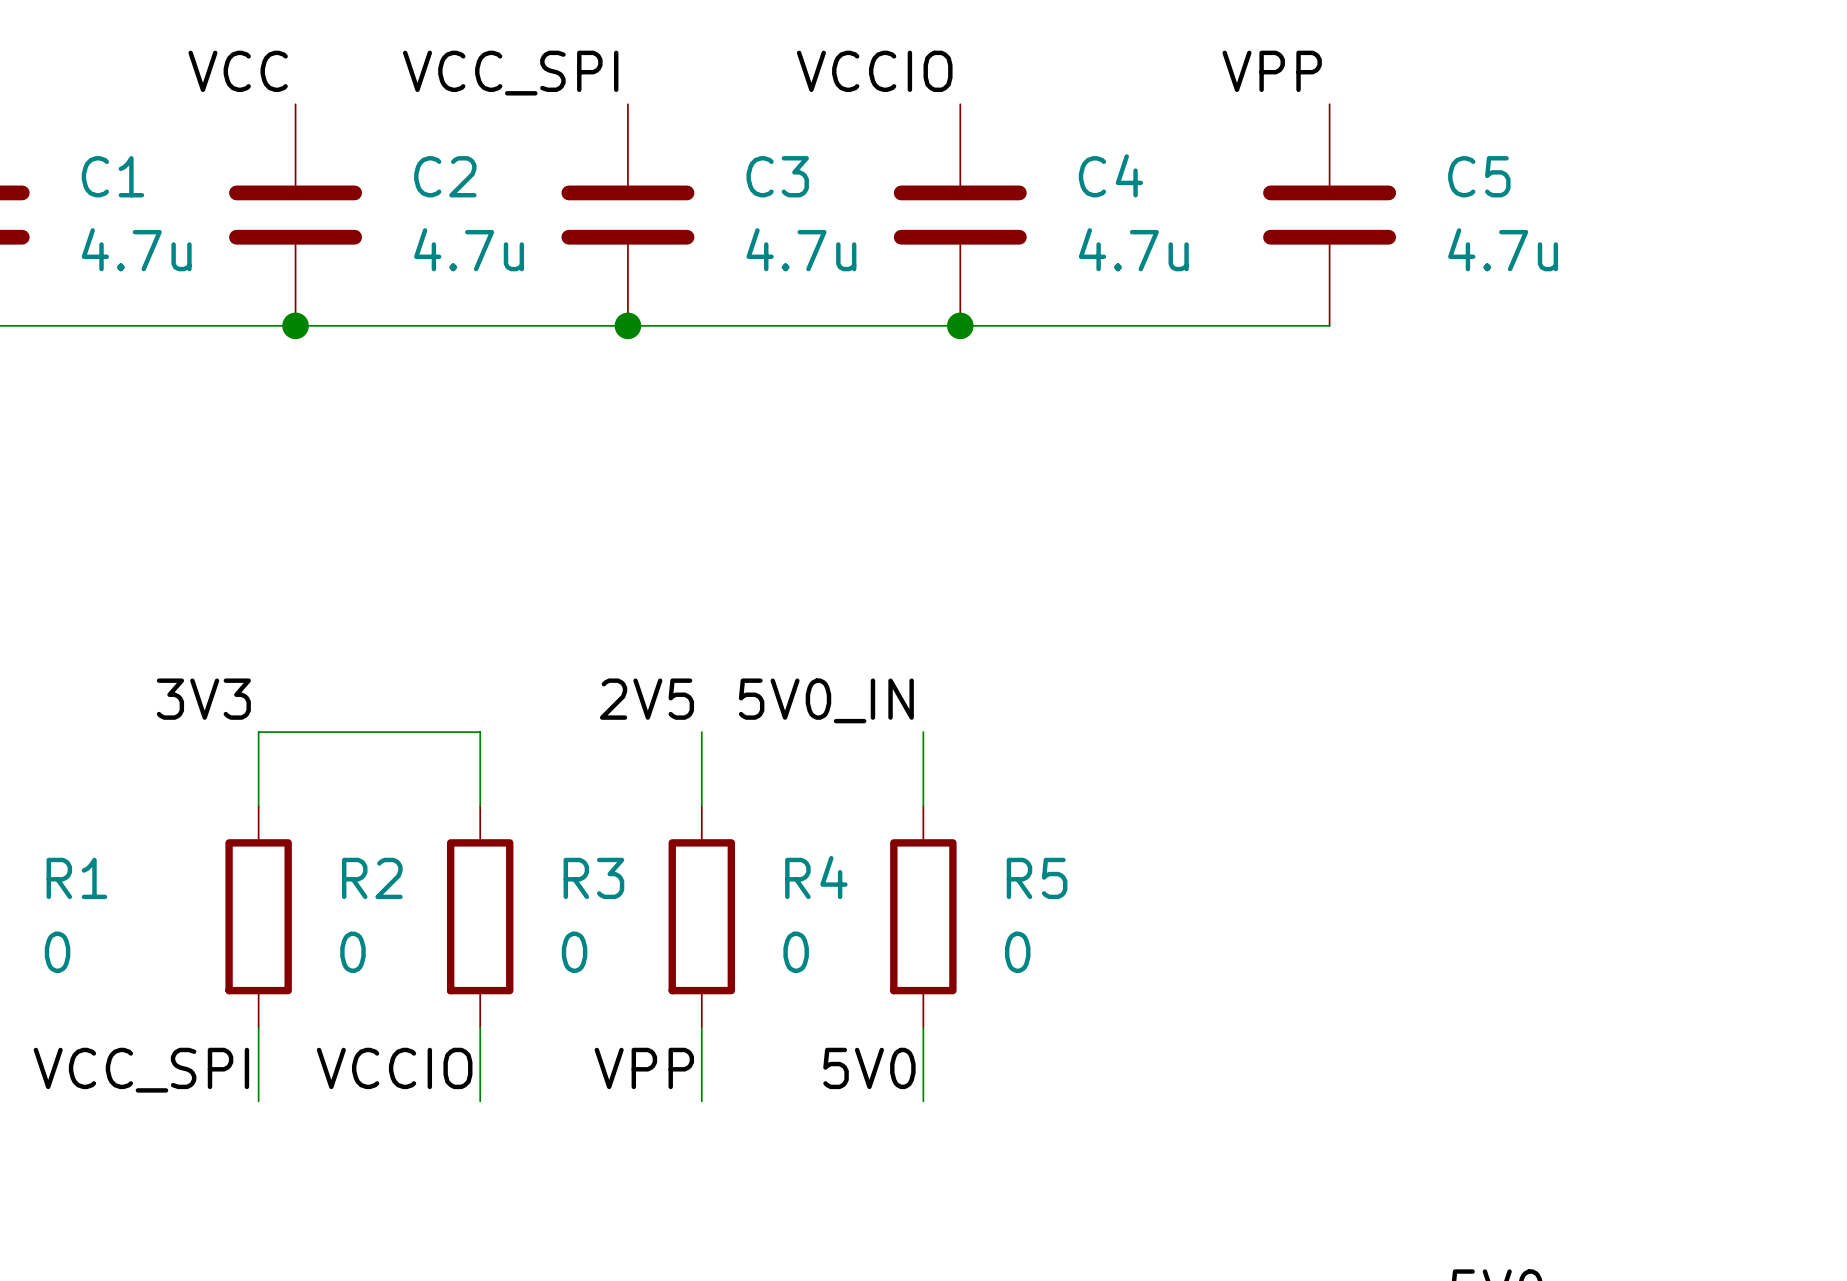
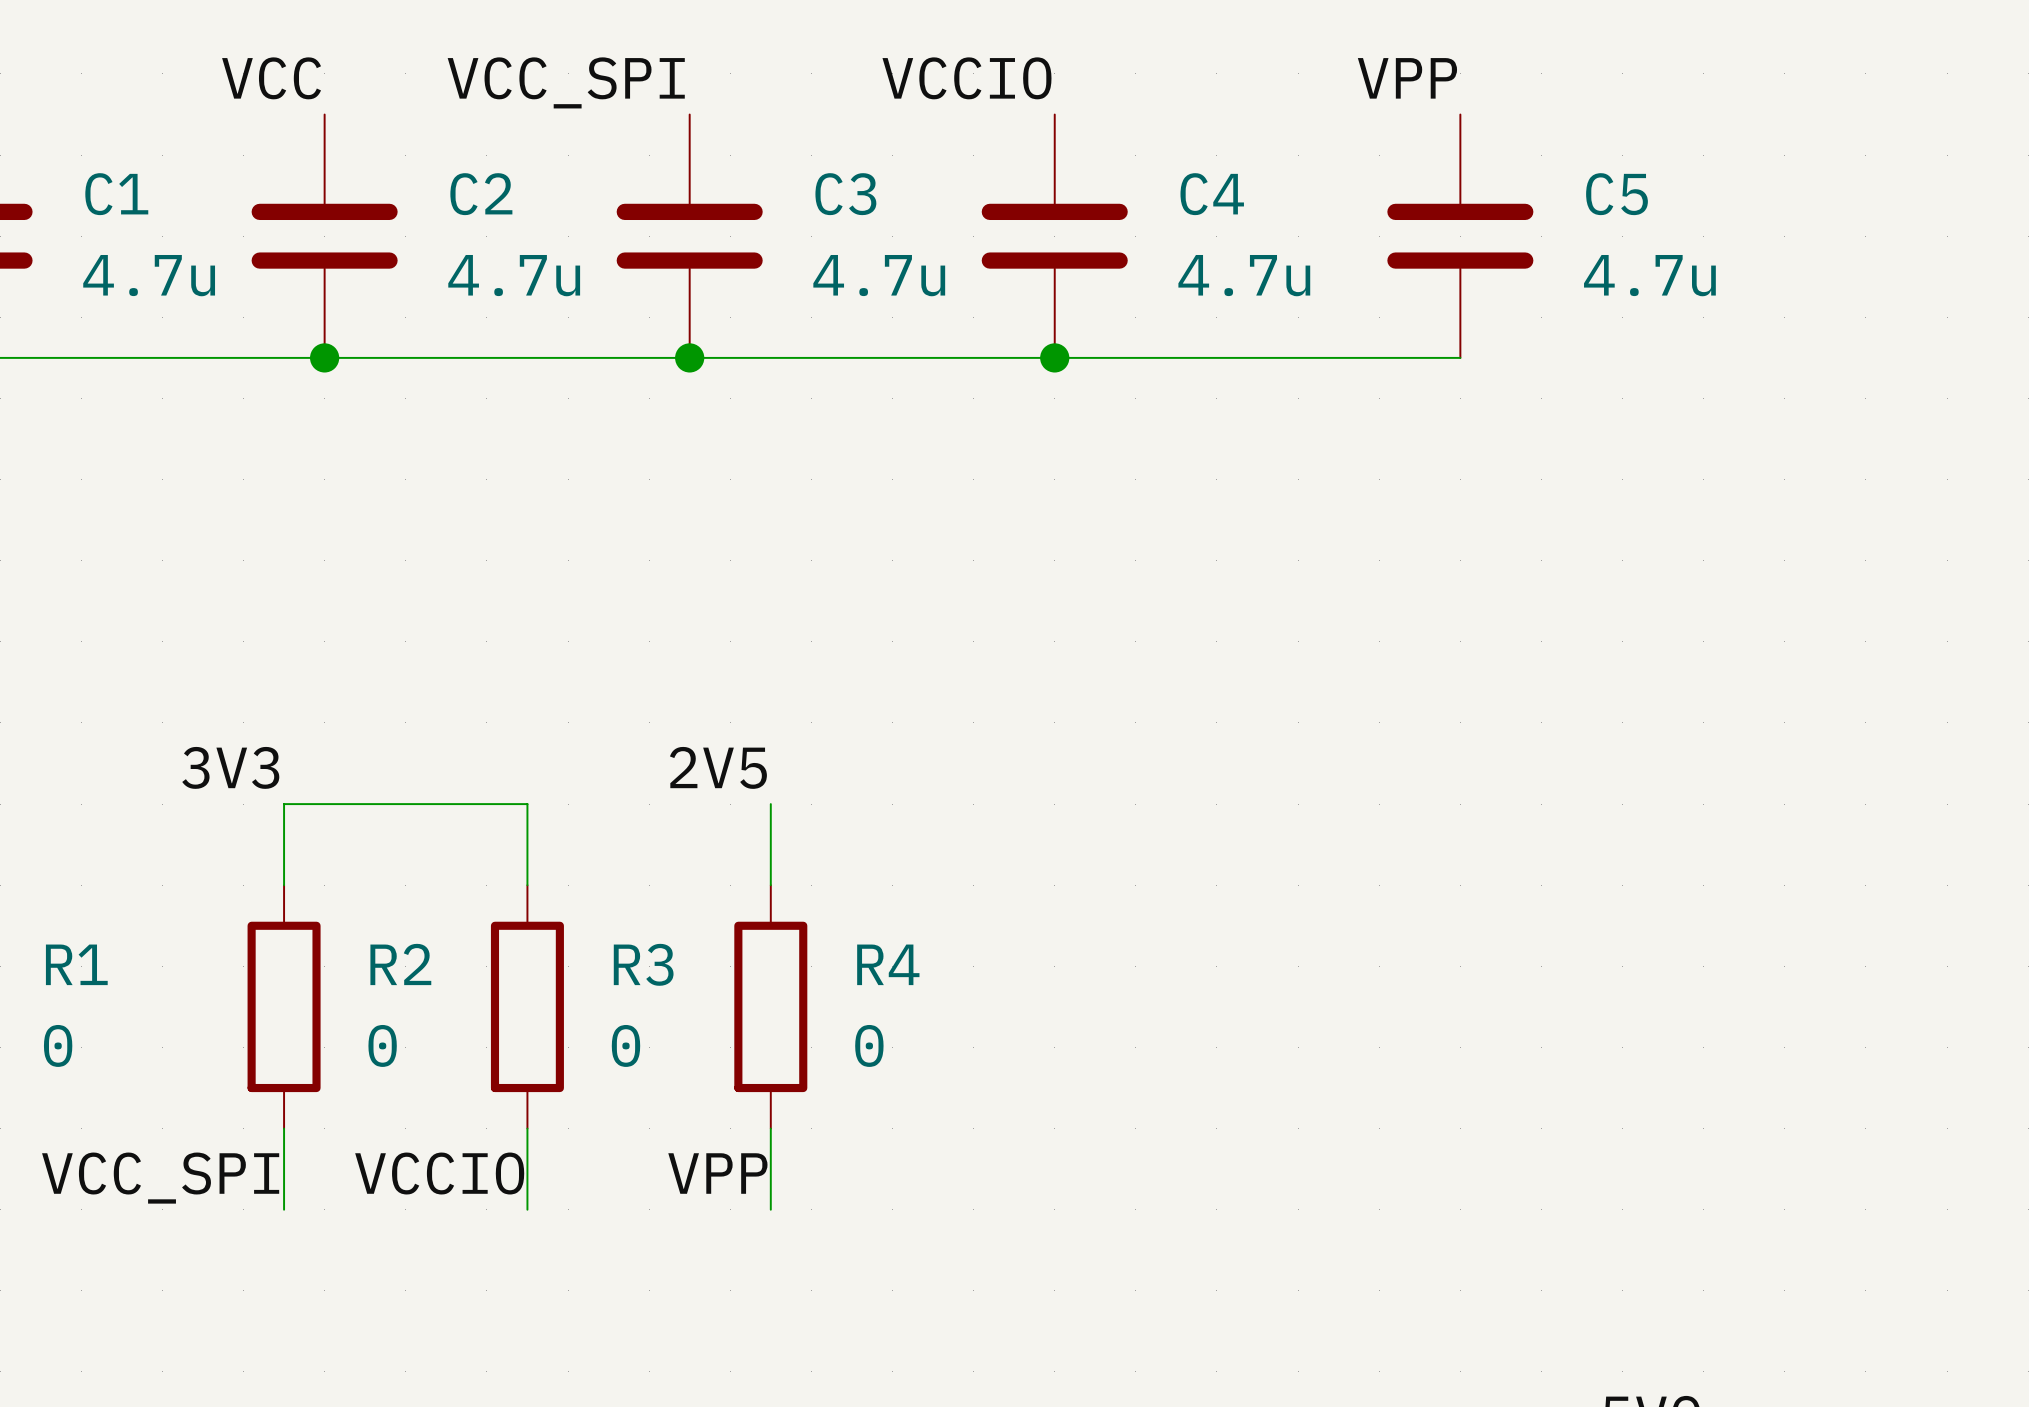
label: 5V0_IN (826, 700) -> none
wire: (923, 732) (923, 805) -> none
R5: 0 (923, 916) -> none
wire: (923, 1027) (923, 1101) -> none
label: 5V0 (869, 1068) -> none

